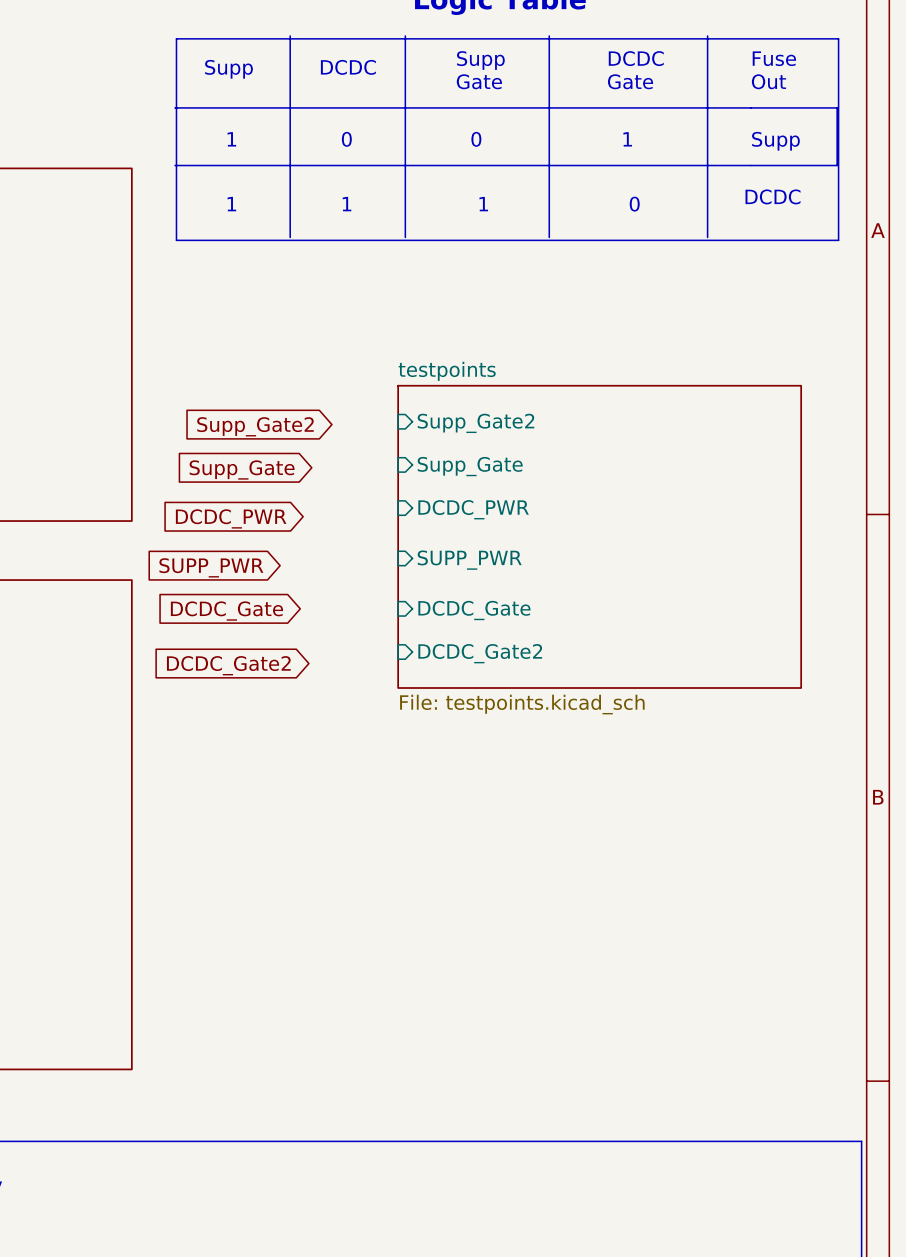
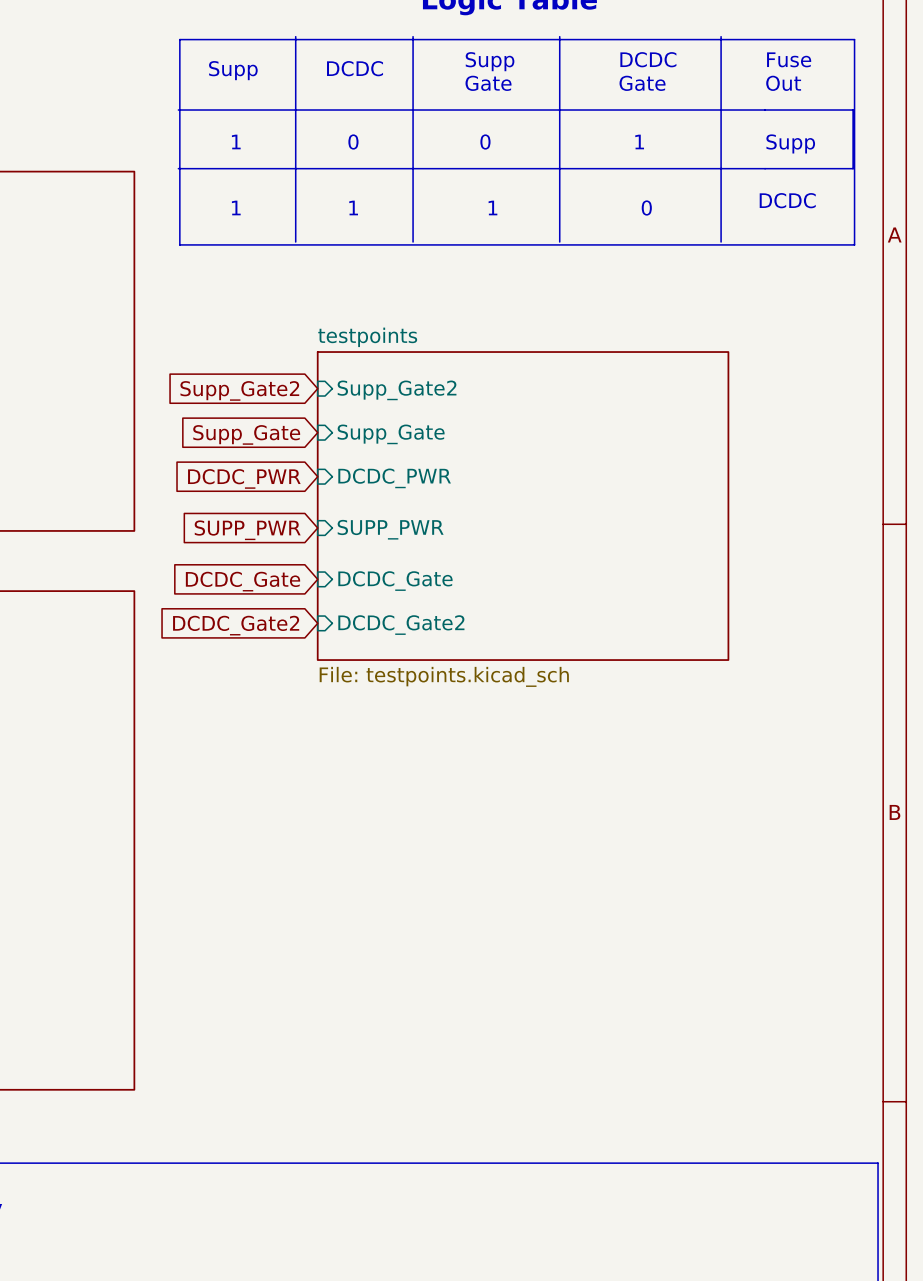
sheet pin position: Supp_Gate2 (475, 423) -> Supp_Gate2 (397, 390)
global label: none -> Supp_Gate (246, 434)
global label position: Supp_Gate2 (255, 426) -> Supp_Gate2 (239, 390)
sheet pin position: Supp_Gate (470, 466) -> Supp_Gate (391, 434)
global label: Supp_Gate (242, 469) -> DCDC_PWR (244, 478)
sheet pin position: DCDC_PWR (473, 509) -> DCDC_PWR (394, 478)
global label: DCDC_PWR (231, 518) -> none
sheet testpoints position: (599, 536) -> (523, 506)
sheet pin position: SUPP_PWR (469, 560) -> SUPP_PWR (390, 529)
global label position: SUPP_PWR (211, 567) -> SUPP_PWR (247, 530)
sheet pin position: DCDC_Gate (474, 610) -> DCDC_Gate (395, 581)
global label position: DCDC_Gate (226, 611) -> DCDC_Gate (243, 581)
sheet pin position: DCDC_Gate2 (480, 653) -> DCDC_Gate2 (401, 625)
global label position: DCDC_Gate2 (228, 665) -> DCDC_Gate2 (236, 625)

